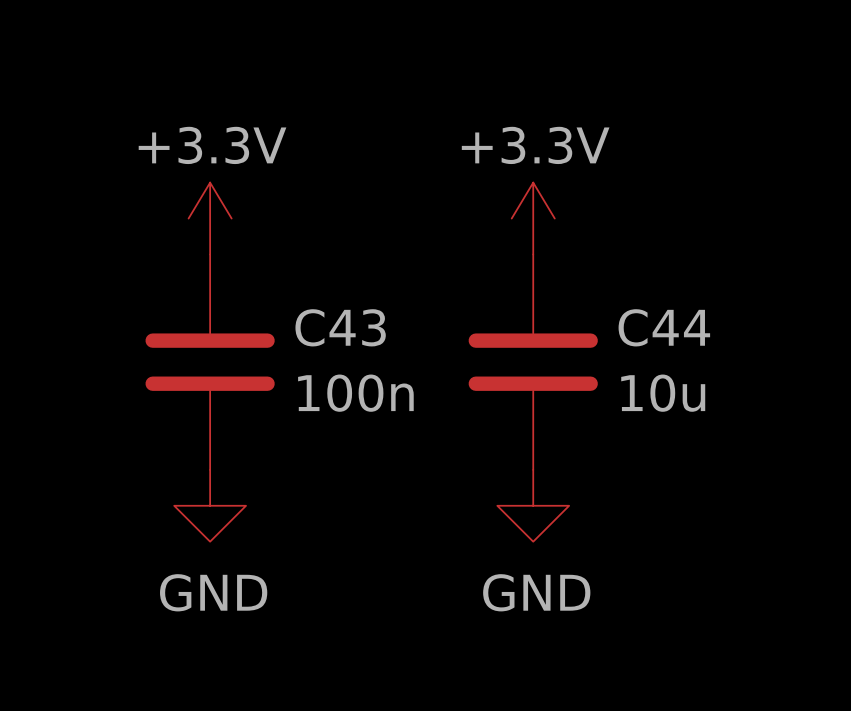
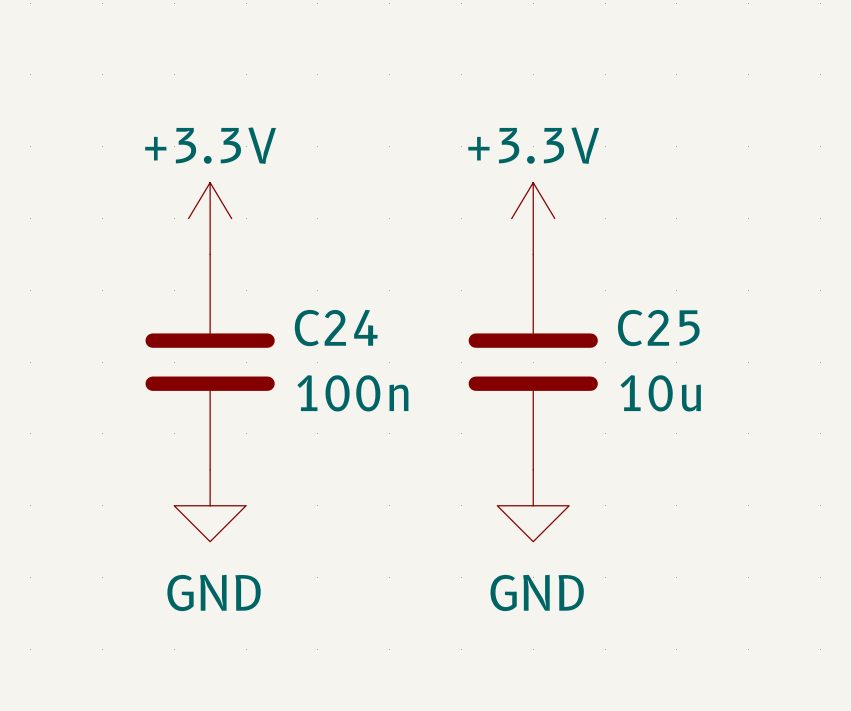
C43 name: C43 (340, 327) -> C24 (336, 327)
C44 name: C44 (664, 327) -> C25 (658, 328)

